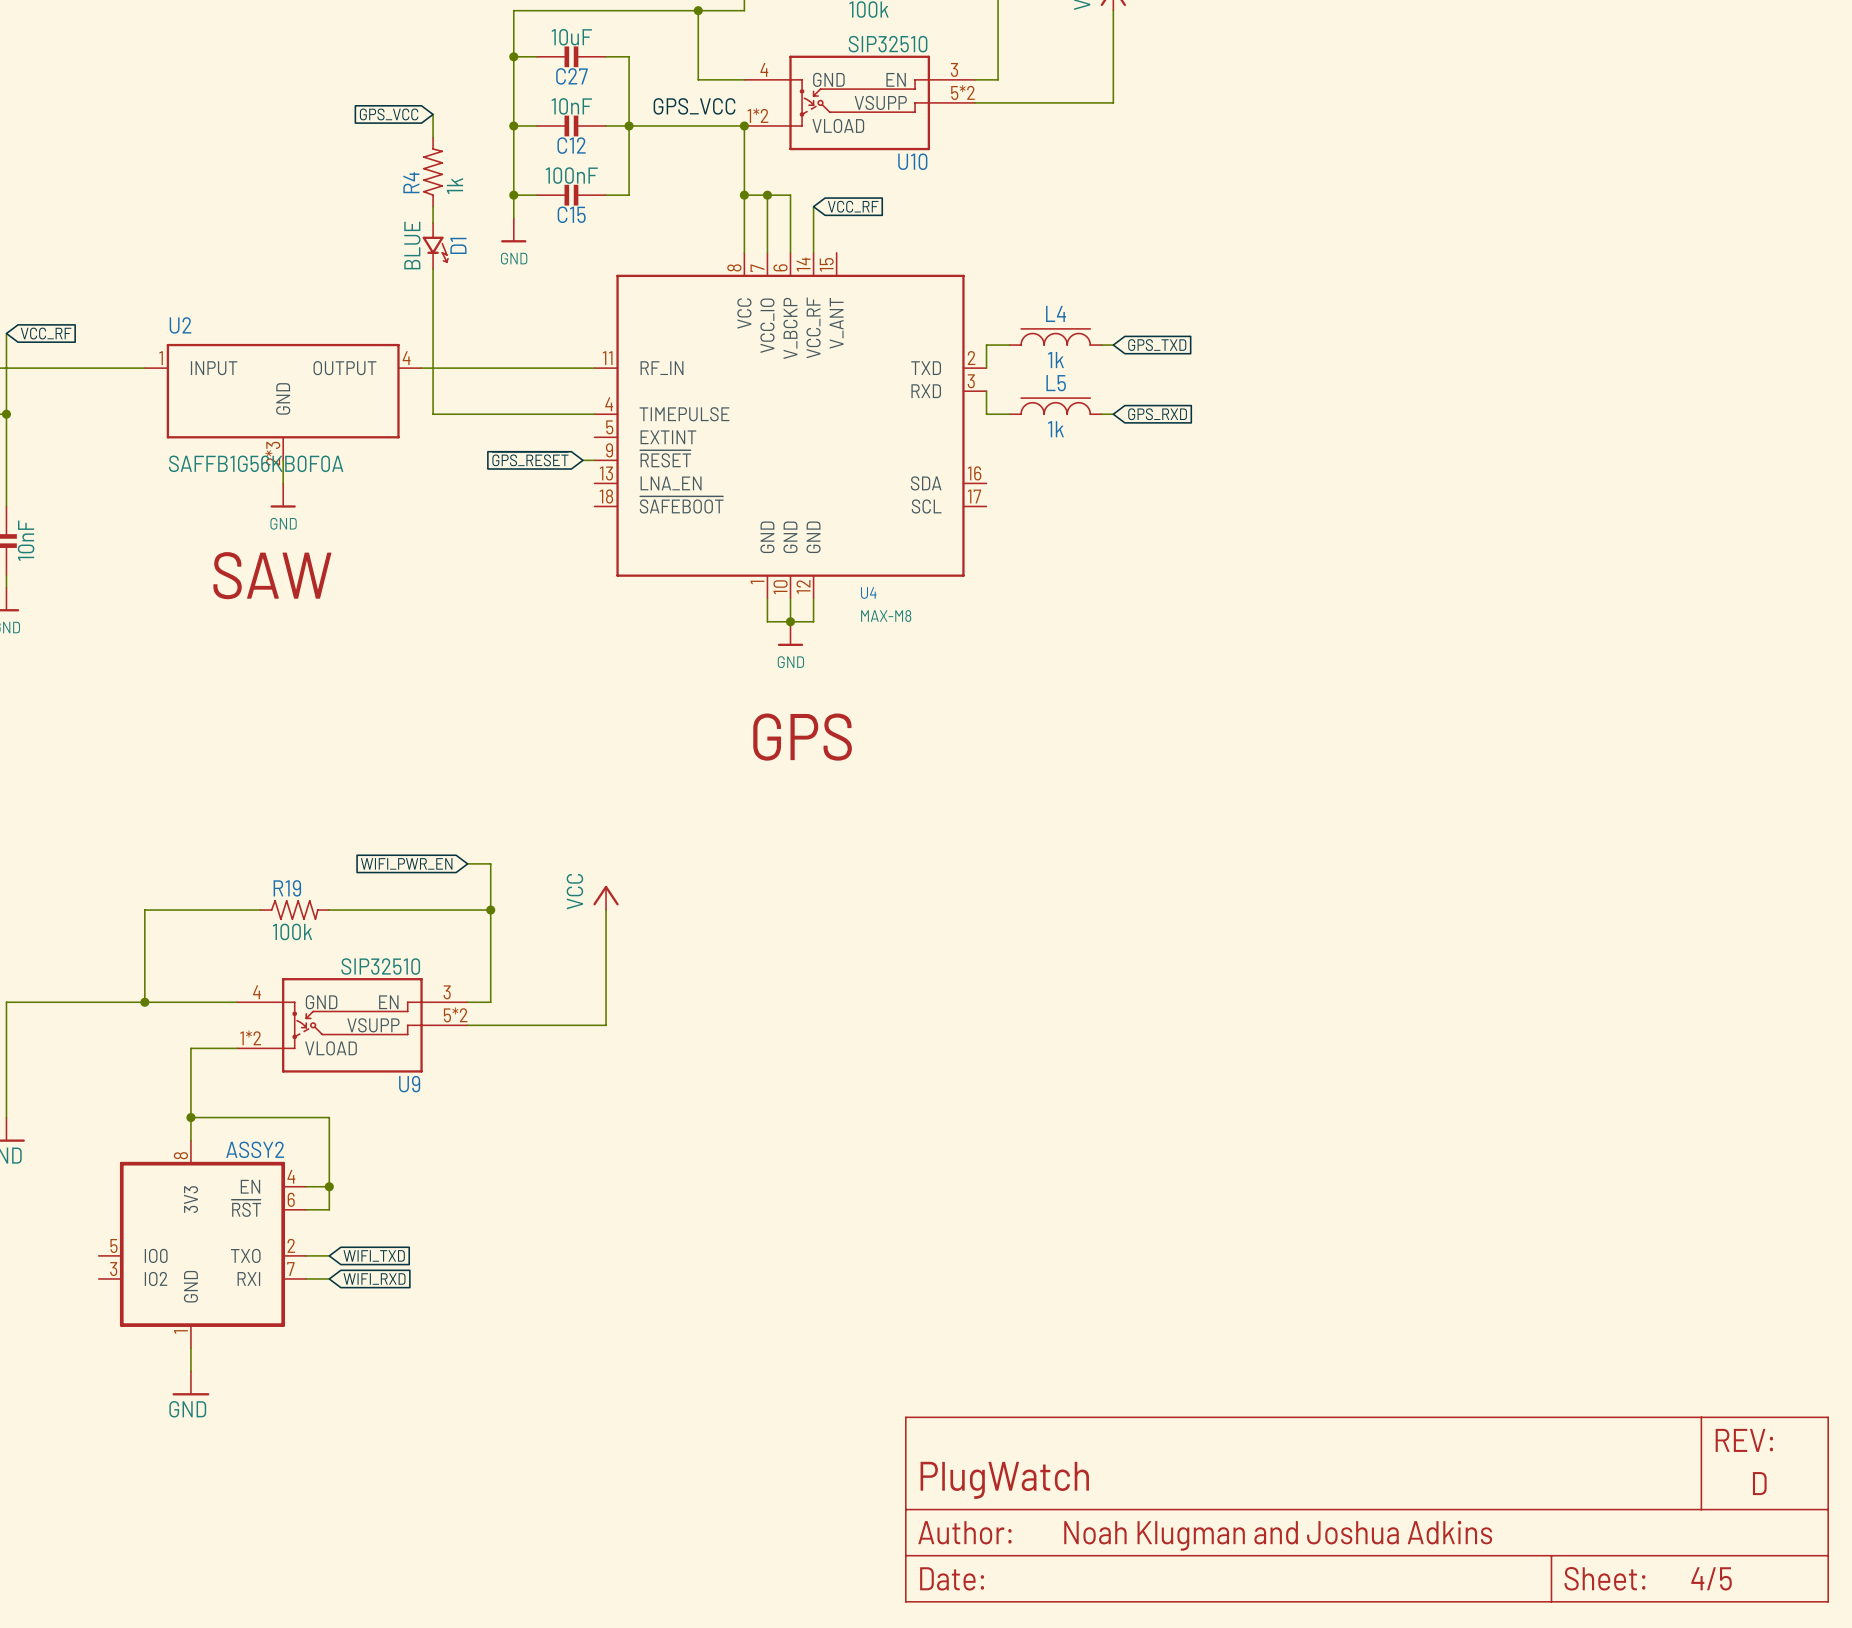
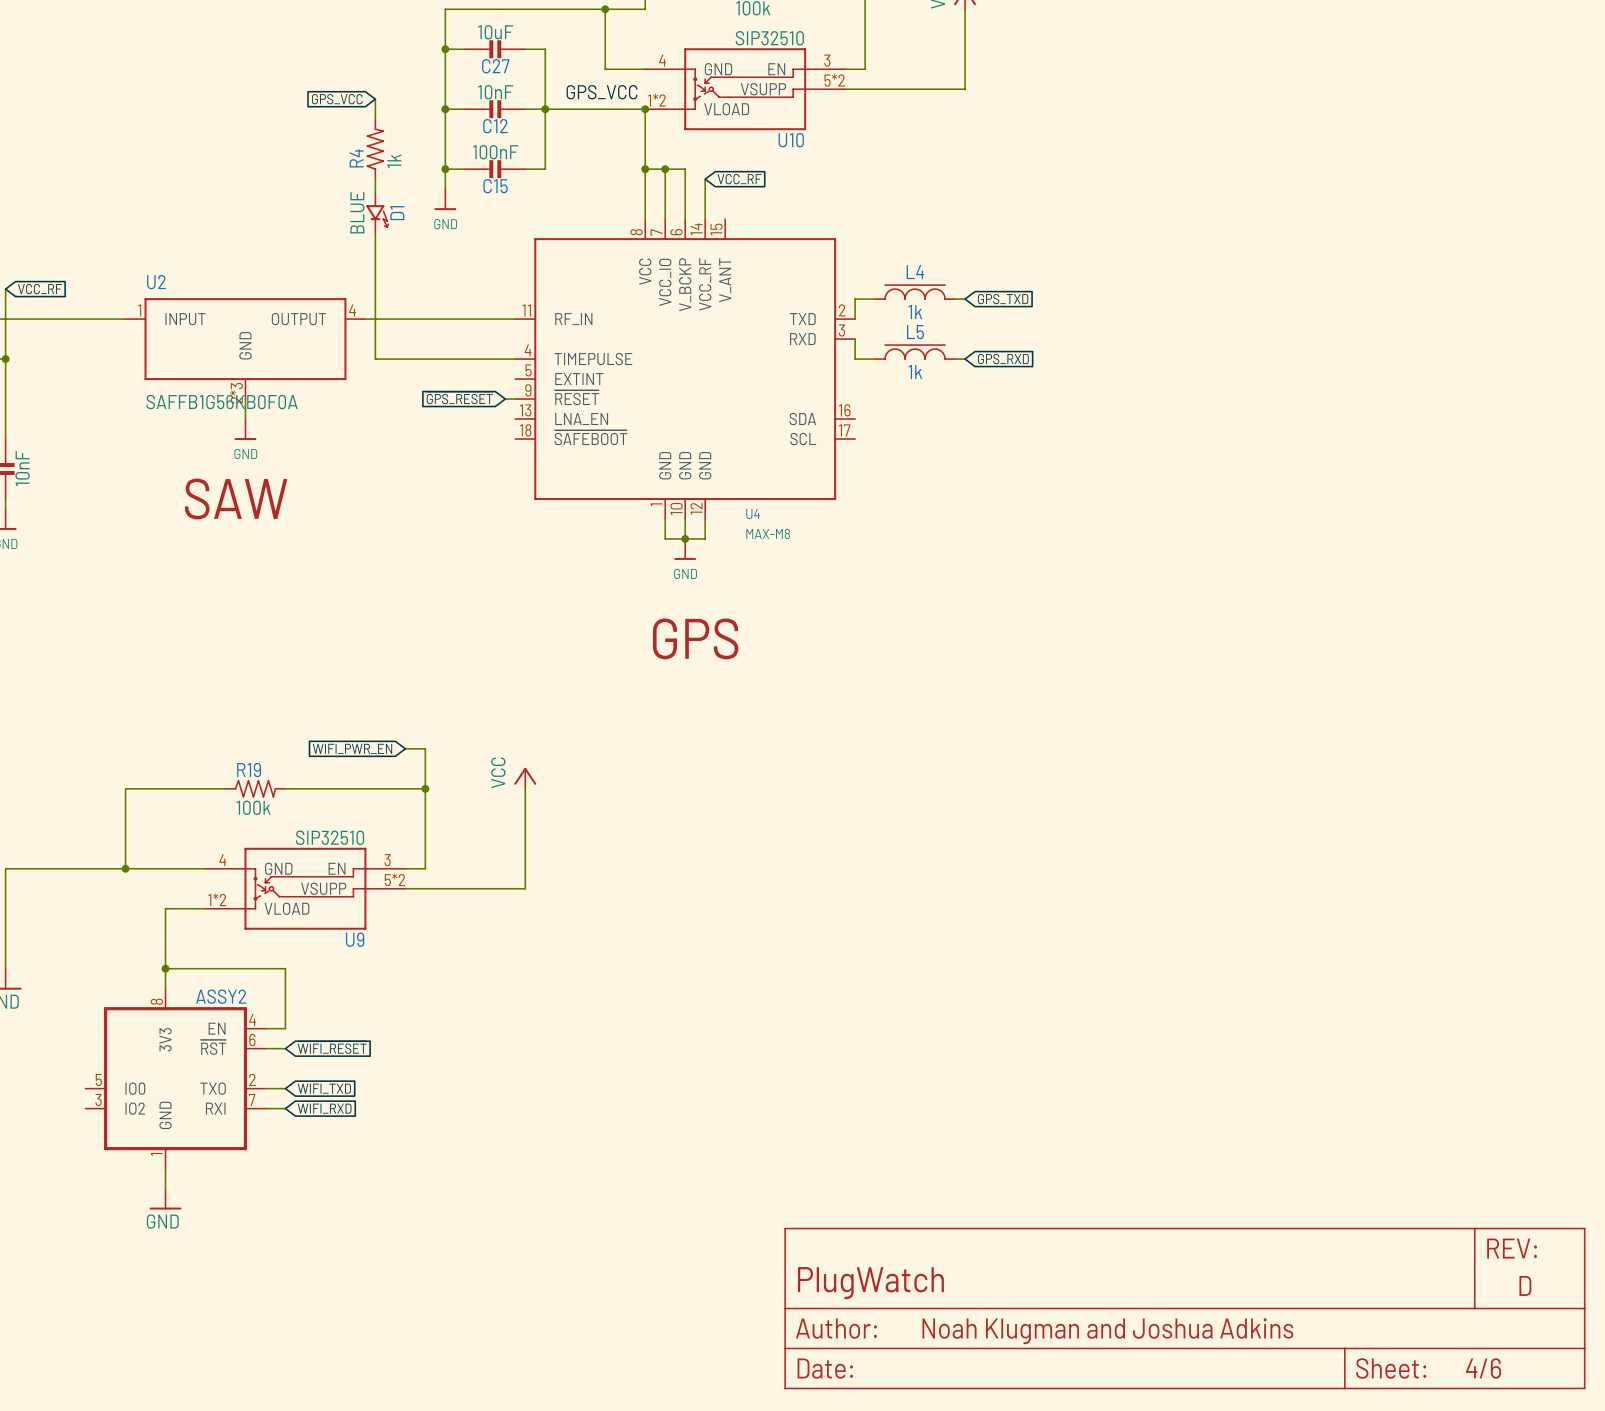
wire: (329, 1186) (329, 1209) -> none
junction: (329, 1186) -> none
global label: none -> ~{WIFI_RESET} (332, 1047)
part text: 4/5 (1711, 1578) -> 4/6 (1483, 1368)

